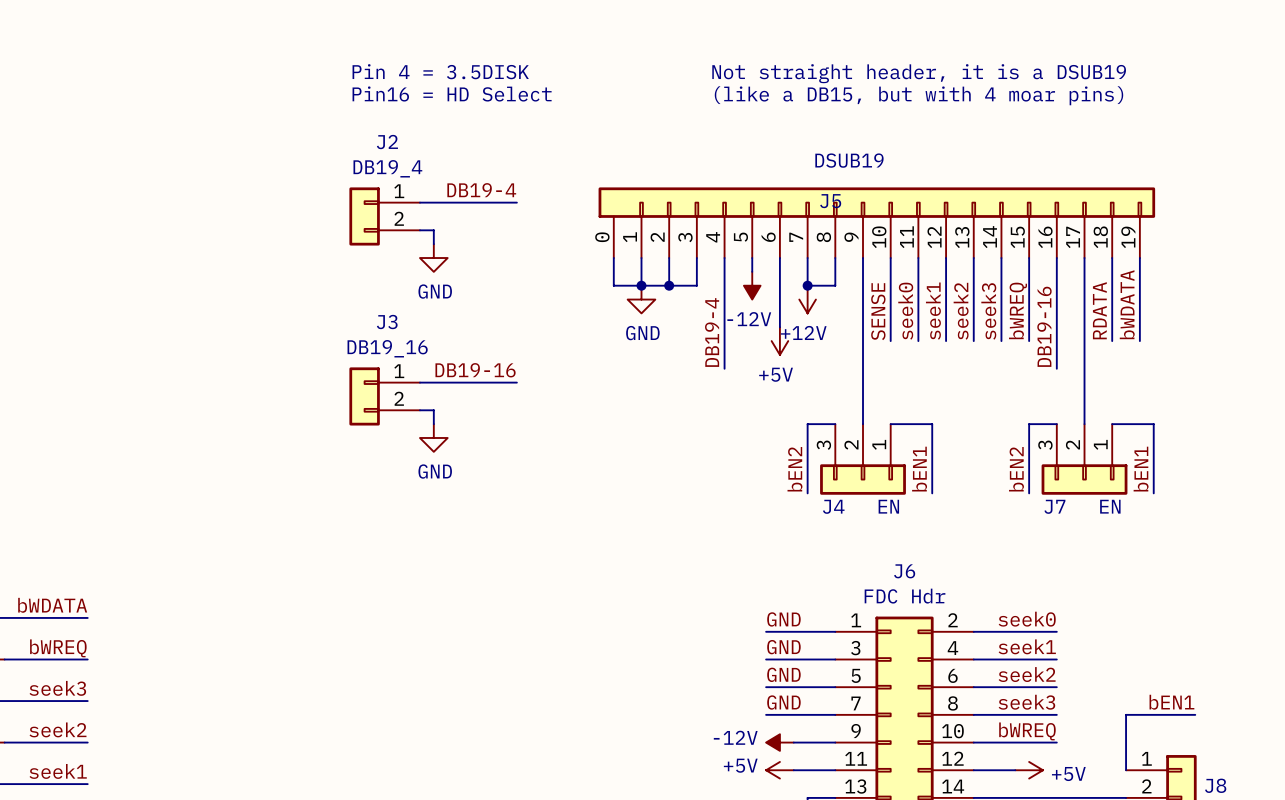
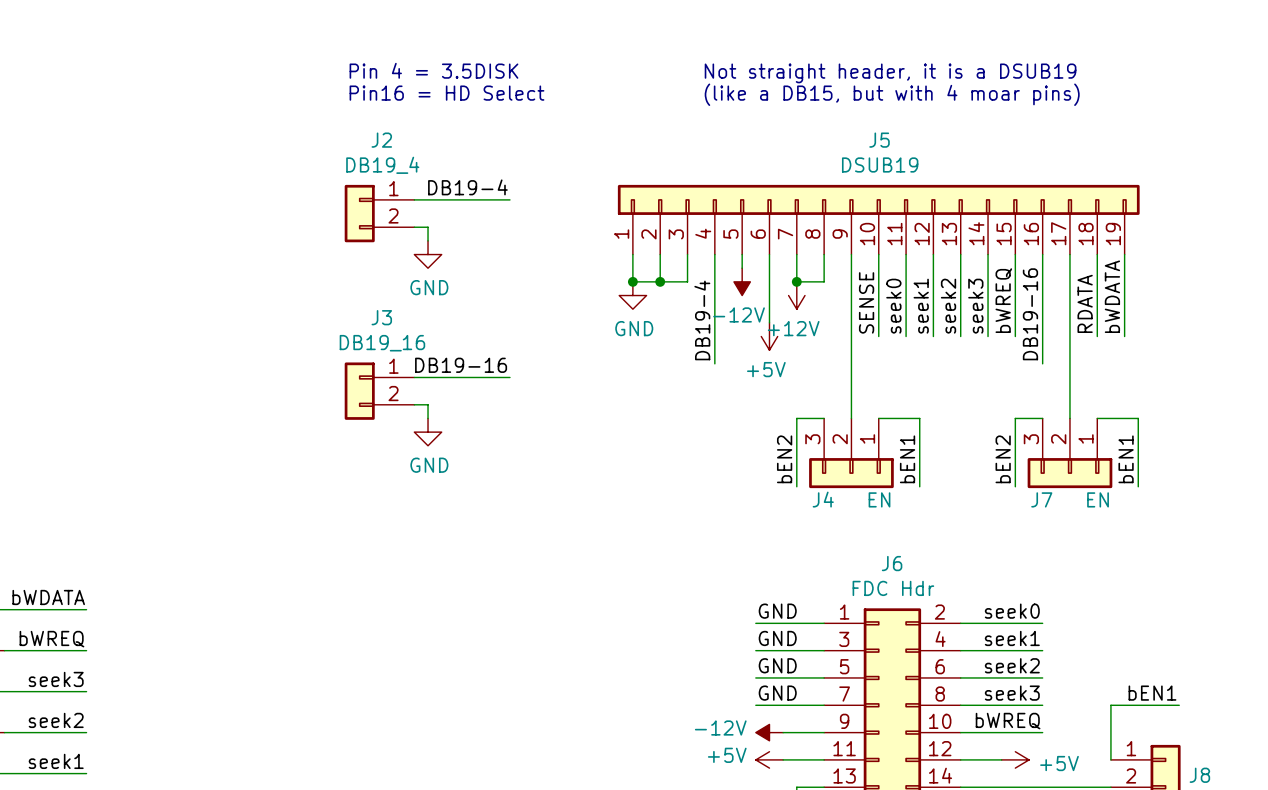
J5 value position: DSUB19 (849, 160) -> DSUB19 (880, 164)
J5 symbol: [598, 187, 1156, 259] -> [617, 184, 1140, 255]
J5 name position: J5 (830, 201) -> J5 (879, 140)
wire: (613, 258) (613, 285) (641, 285) -> none

